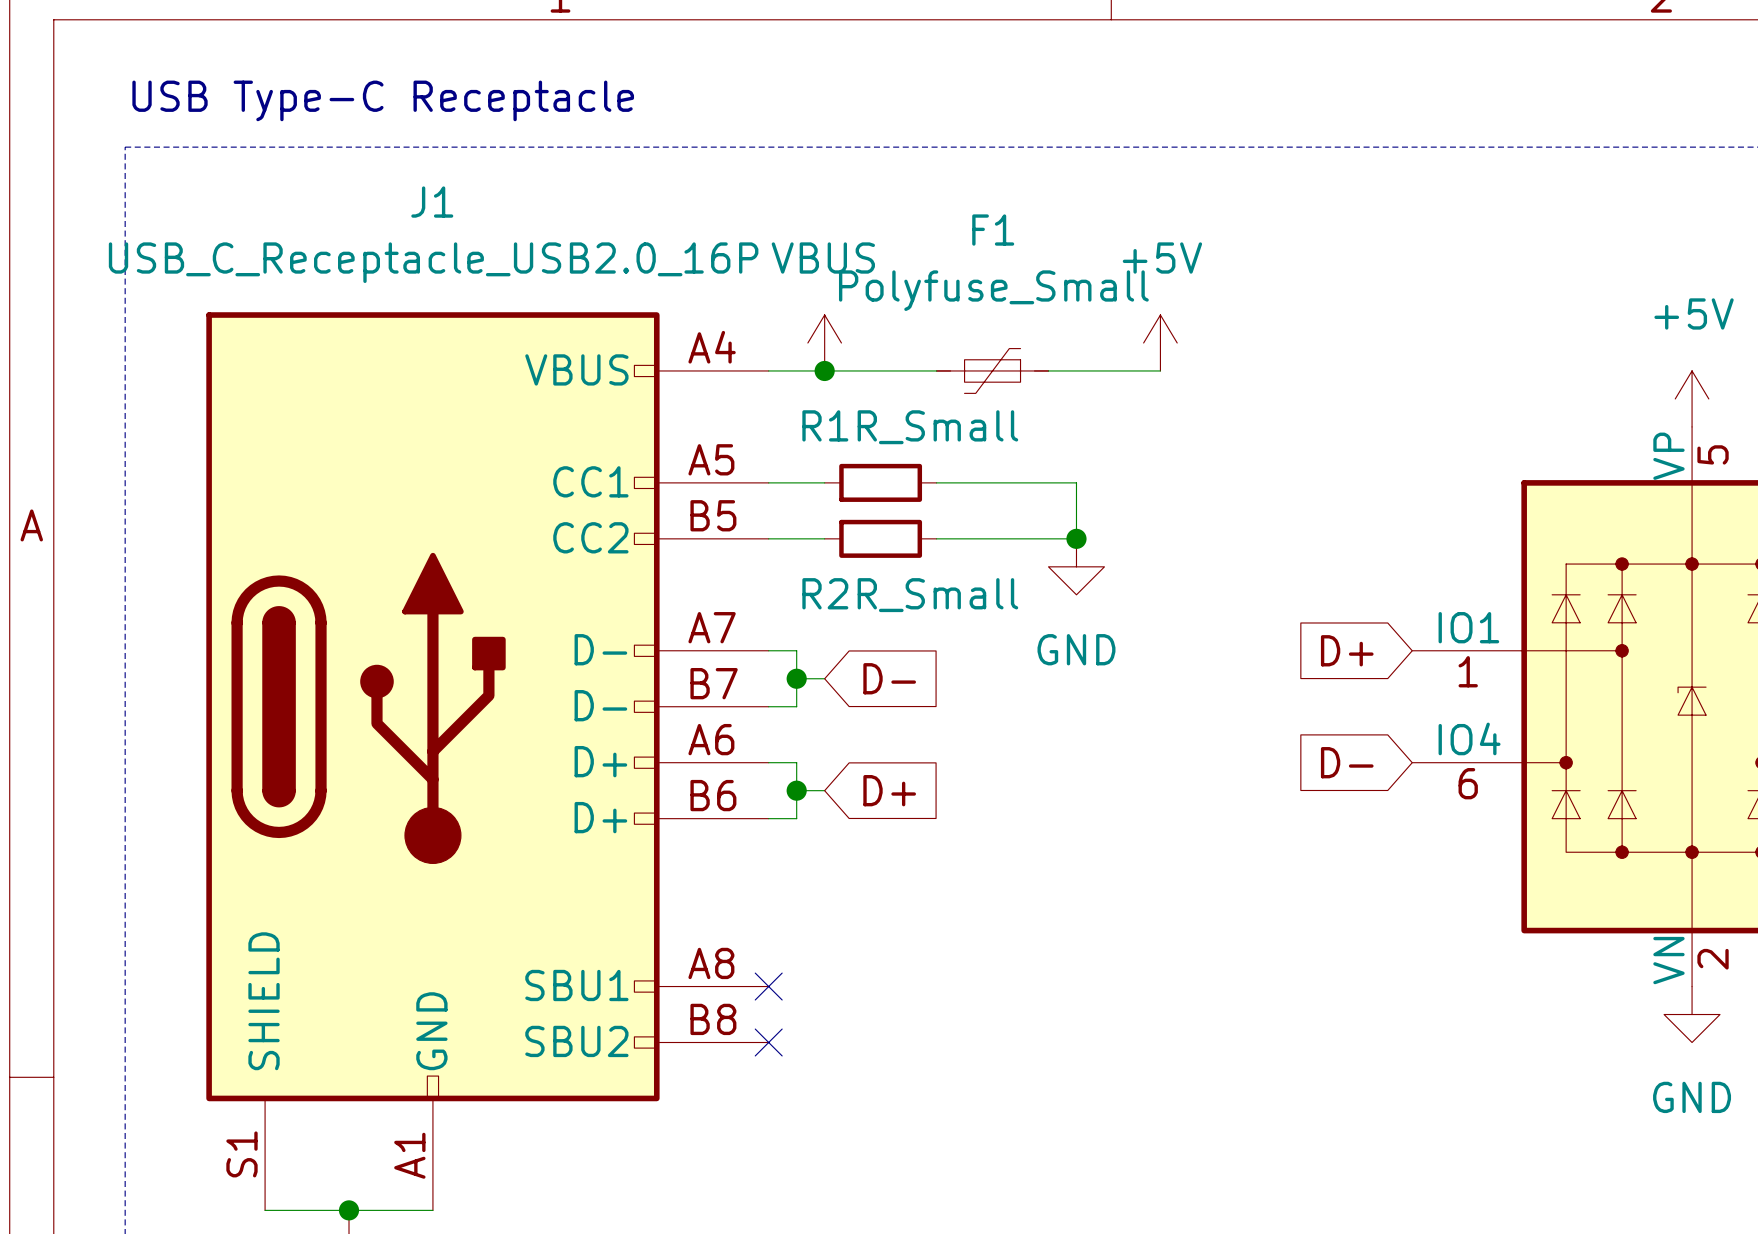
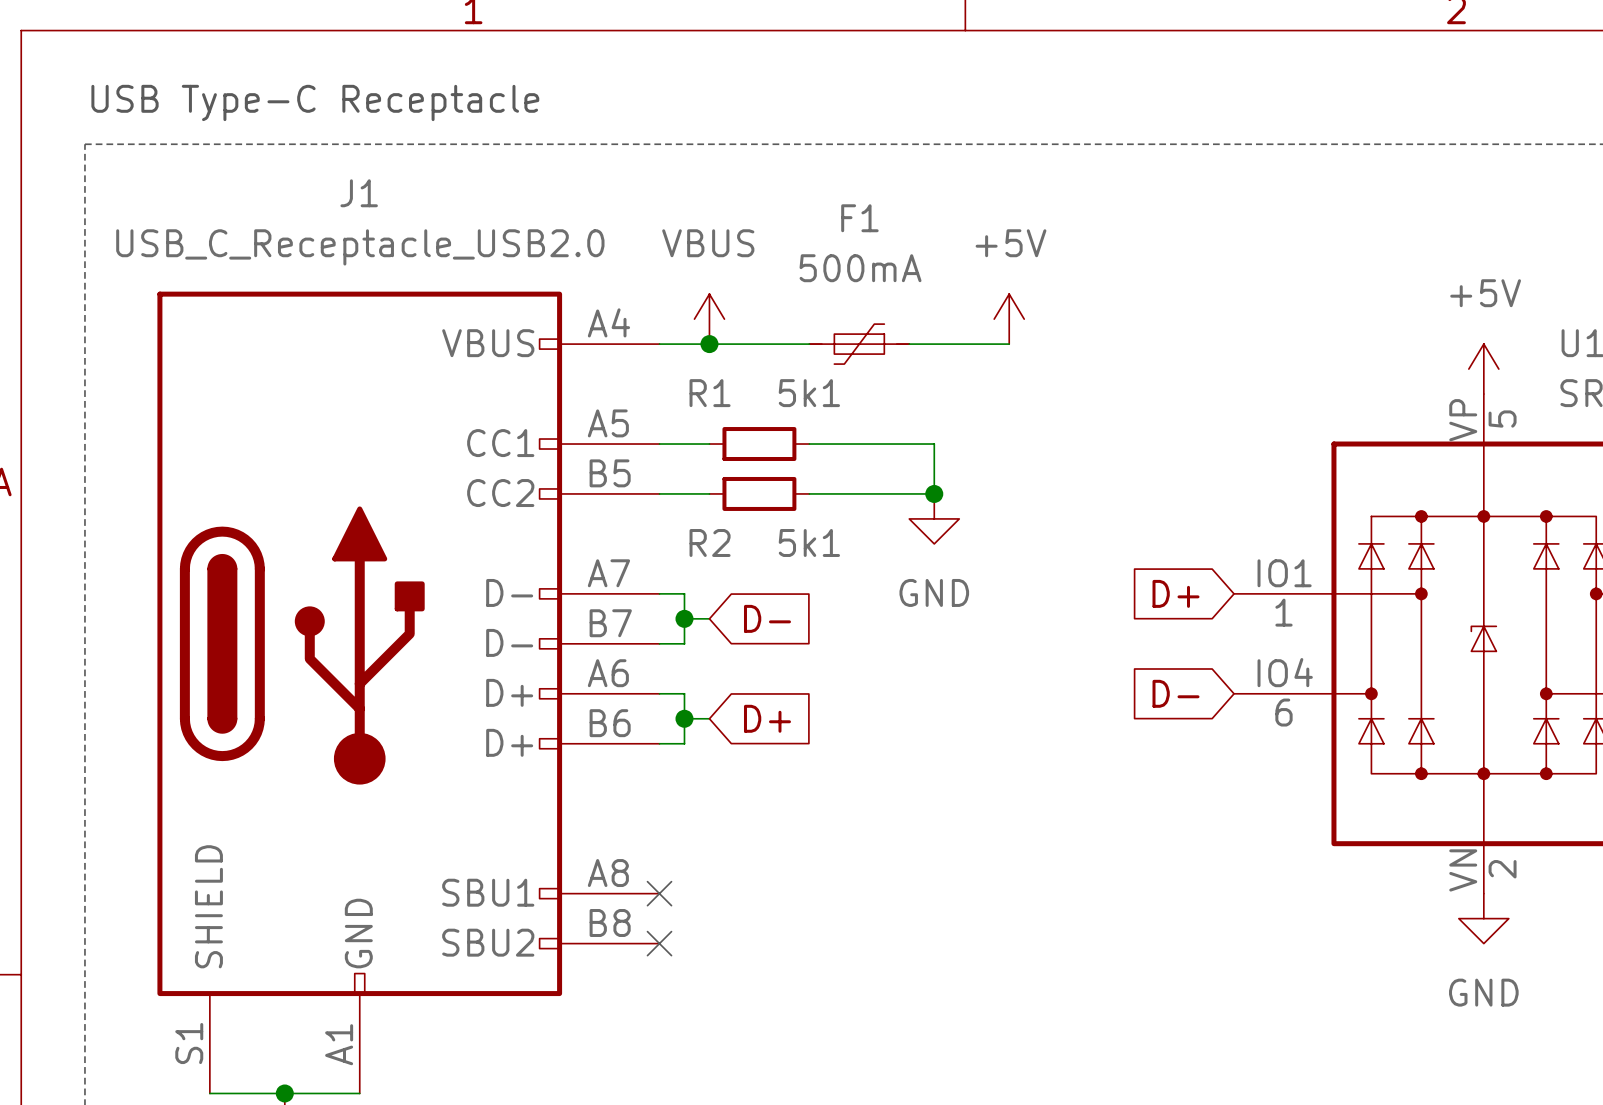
J1 value: USB_C_Receptacle_USB2.0_16P (433, 262) -> USB_C_Receptacle_USB2.0 (360, 247)
F1 value: Polyfuse_Small (993, 290) -> 500mA (860, 268)
R1 value: R_Small (937, 427) -> 5k1 (809, 393)
R2 value: R_Small (937, 595) -> 5k1 (809, 542)

